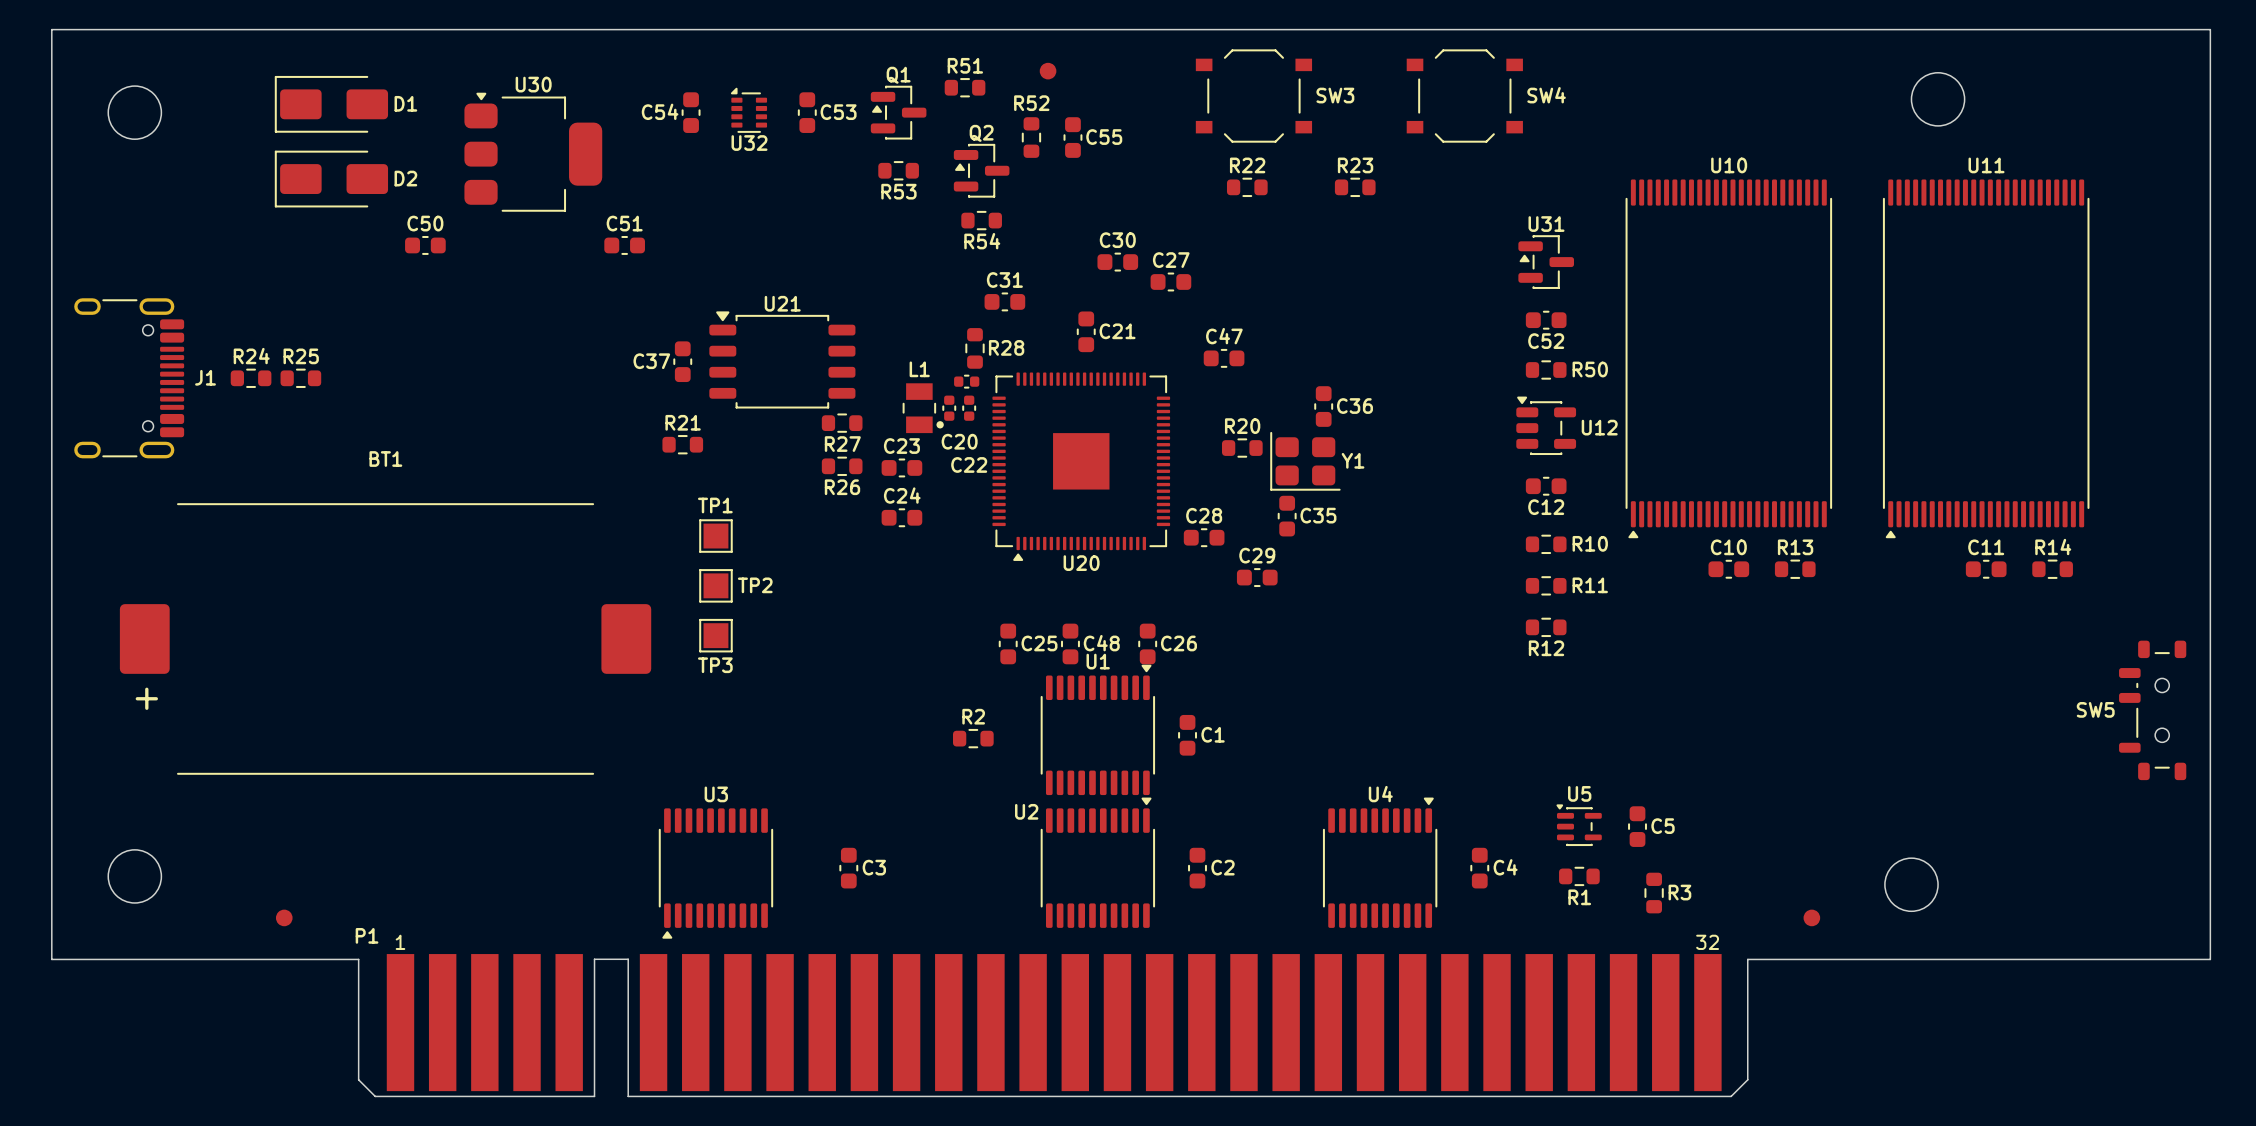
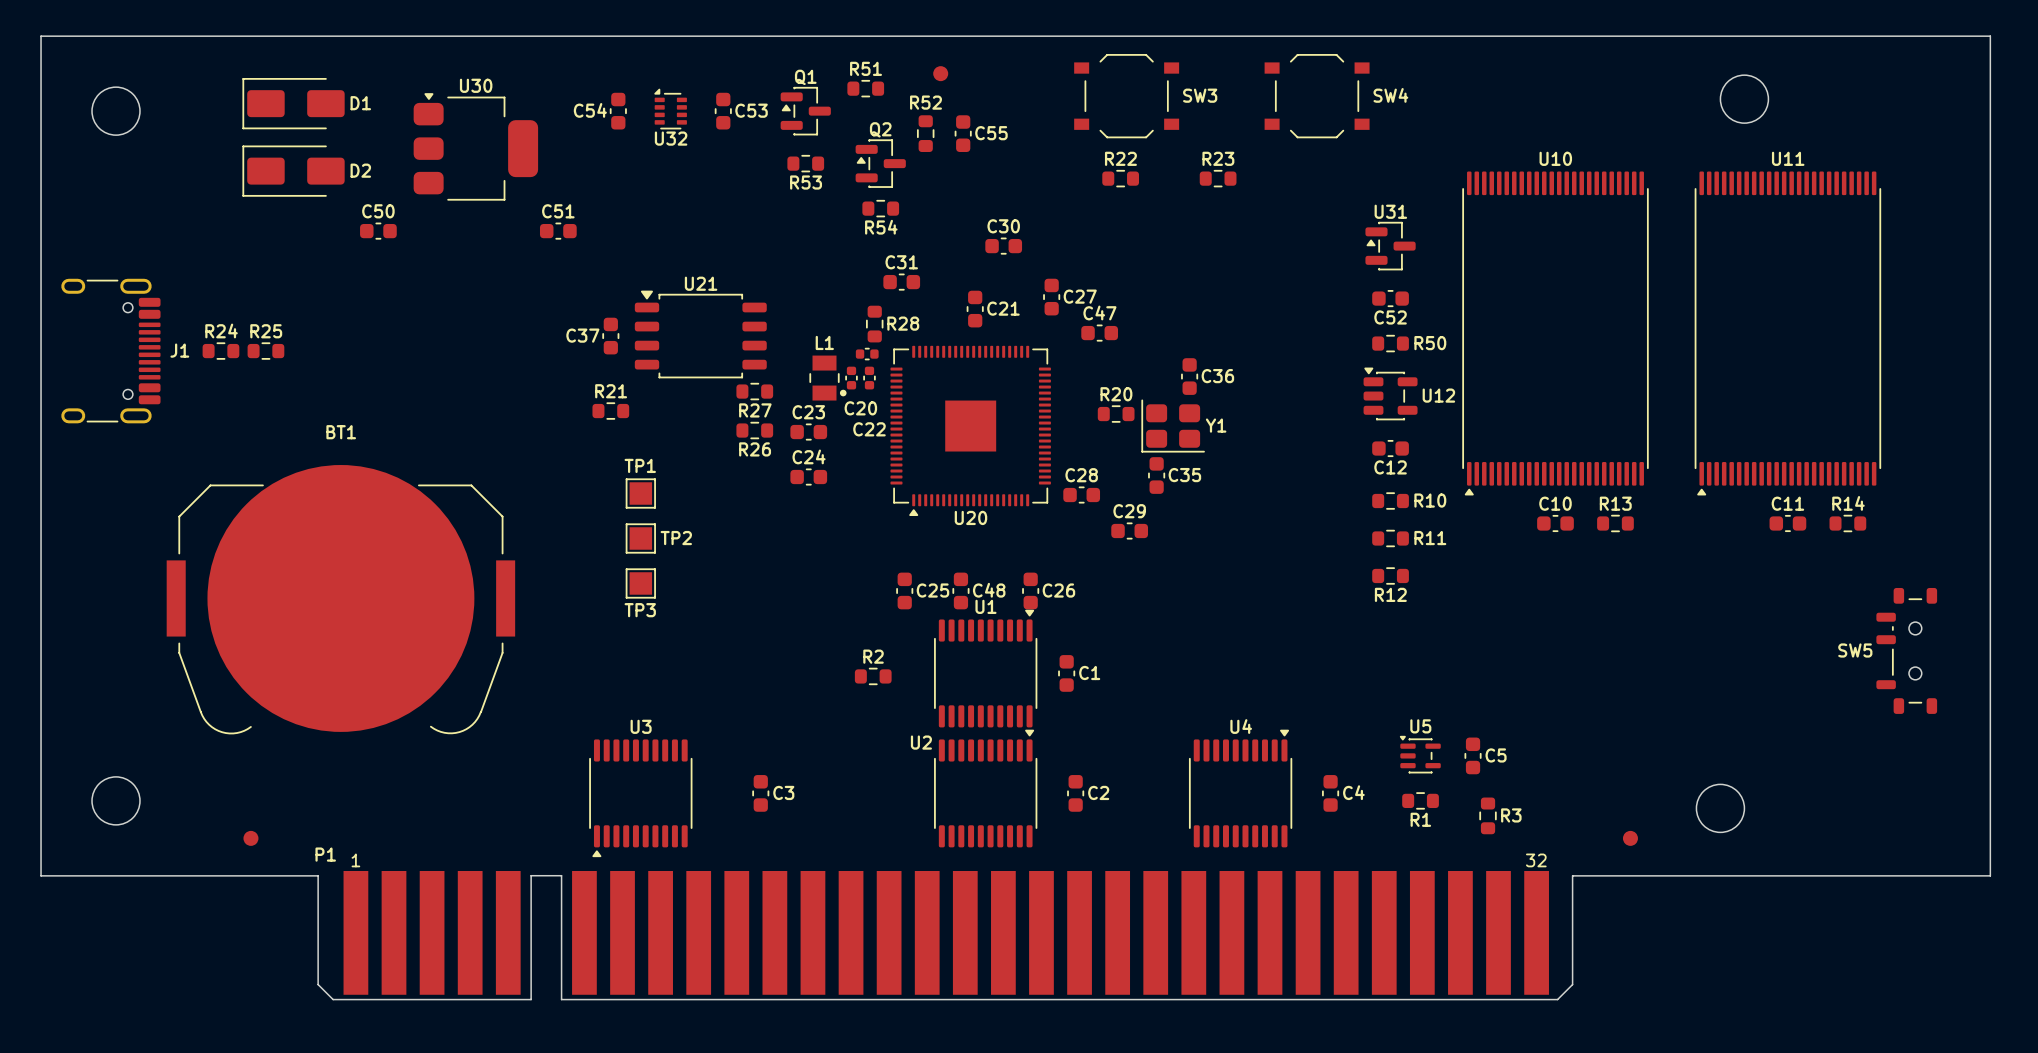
C27 rotation: 0° (1170, 281) -> 90° clockwise (1051, 297)
C27 position: (1170, 281) -> (1051, 297)
BT1 footprint: [119, 503, 652, 775] -> [166, 465, 516, 735]
SW5 position: (2152, 710) -> (1906, 650)

